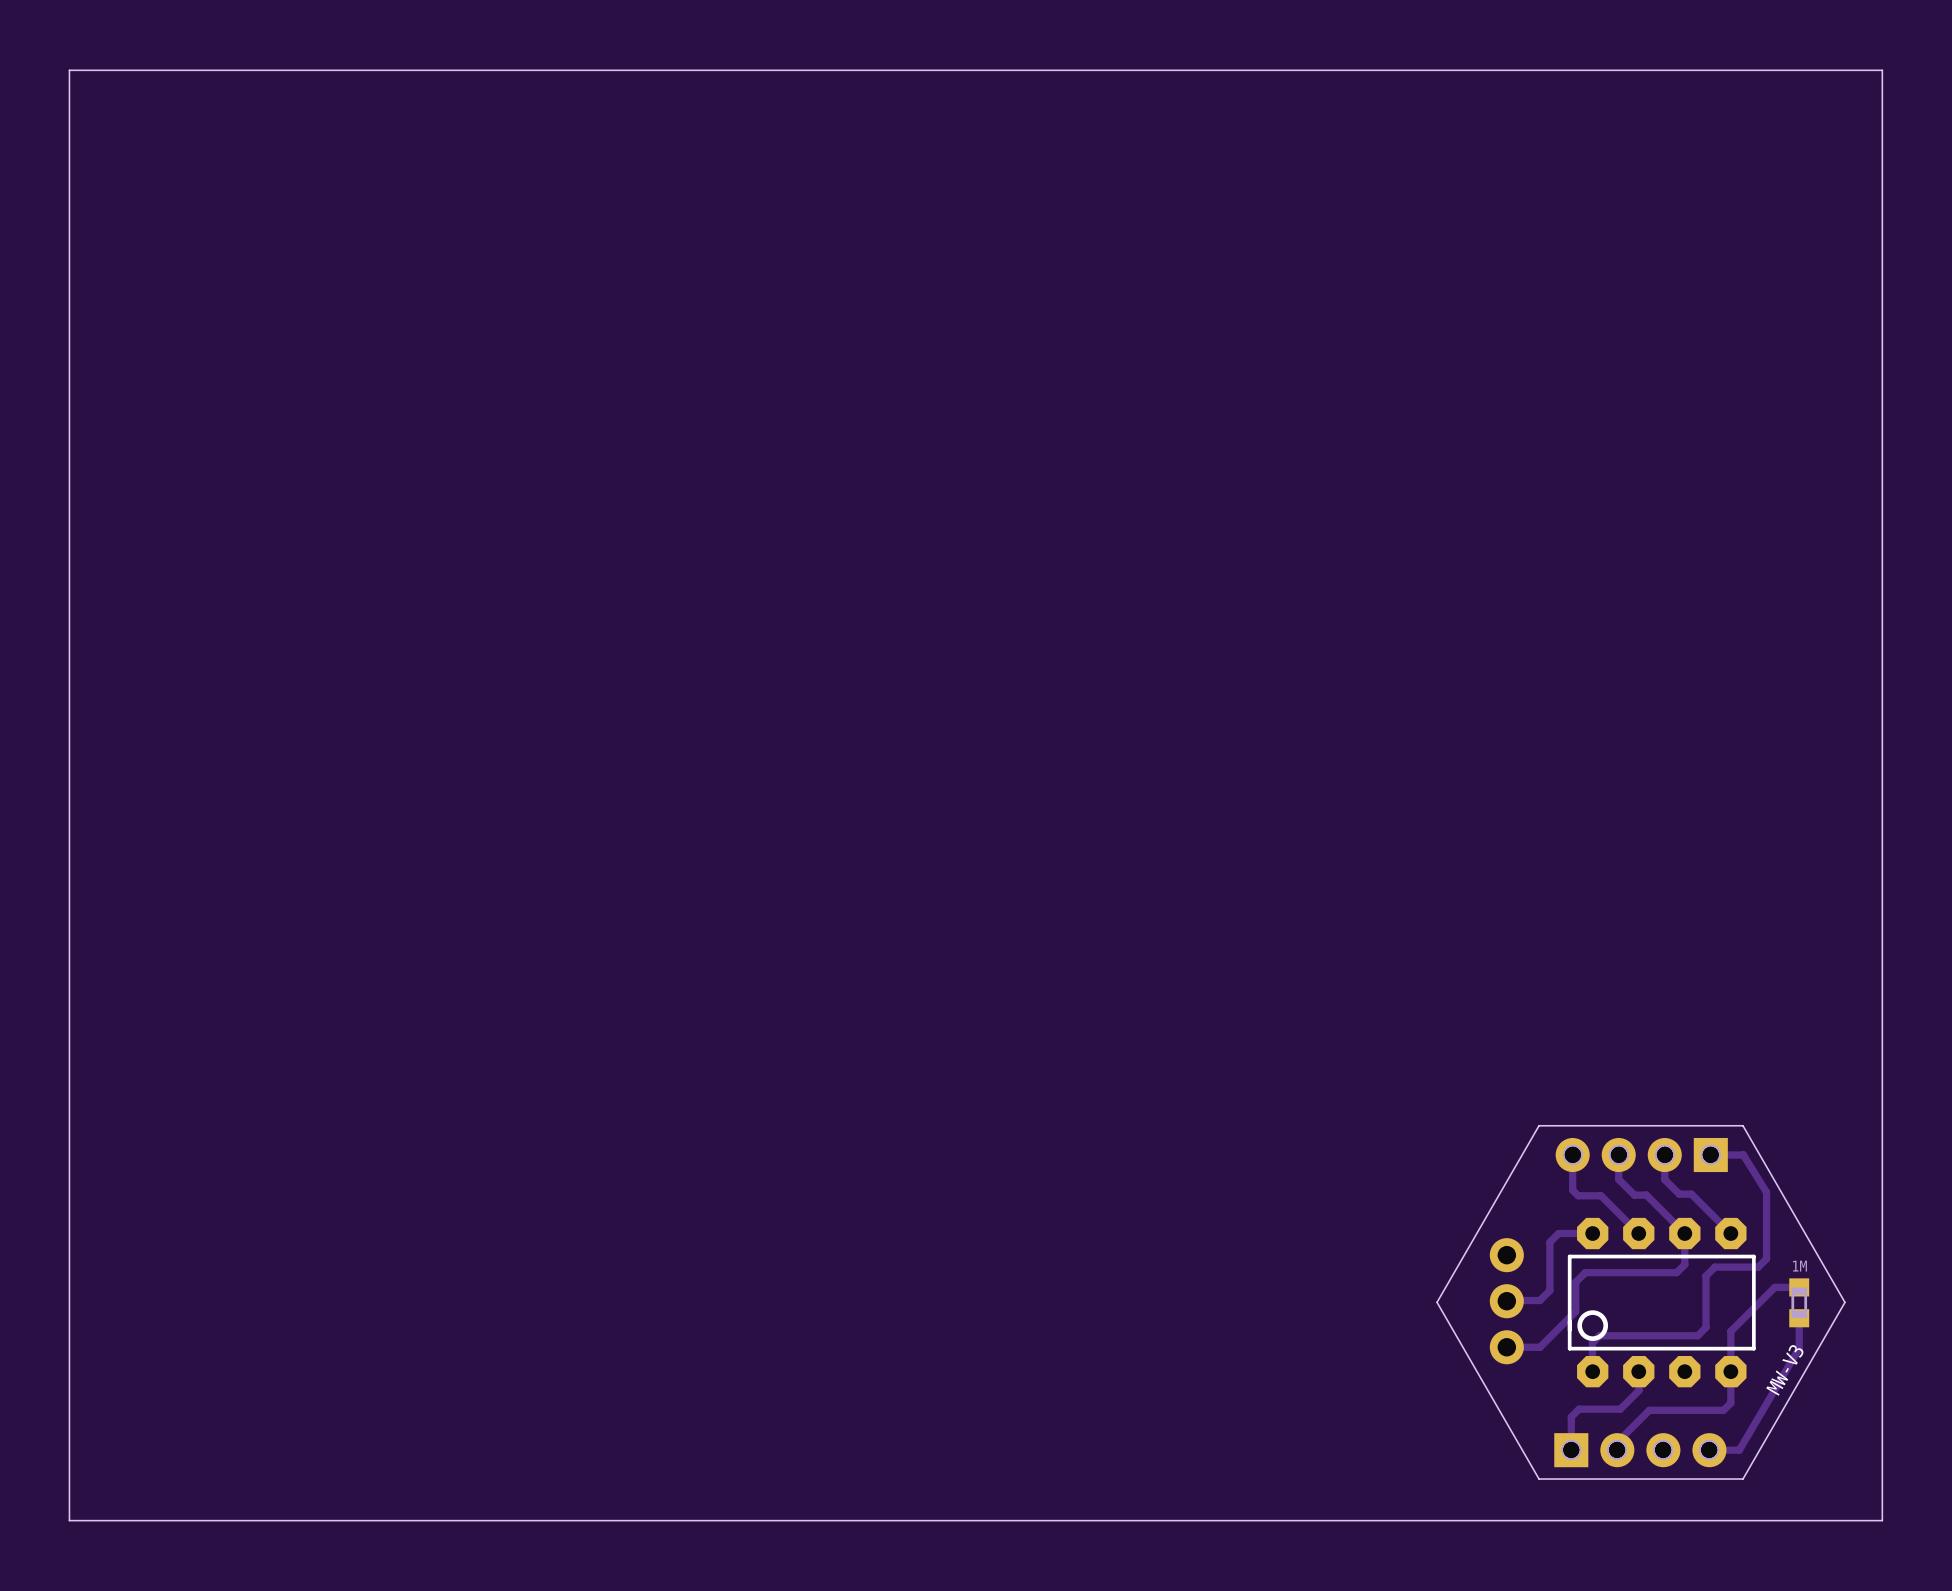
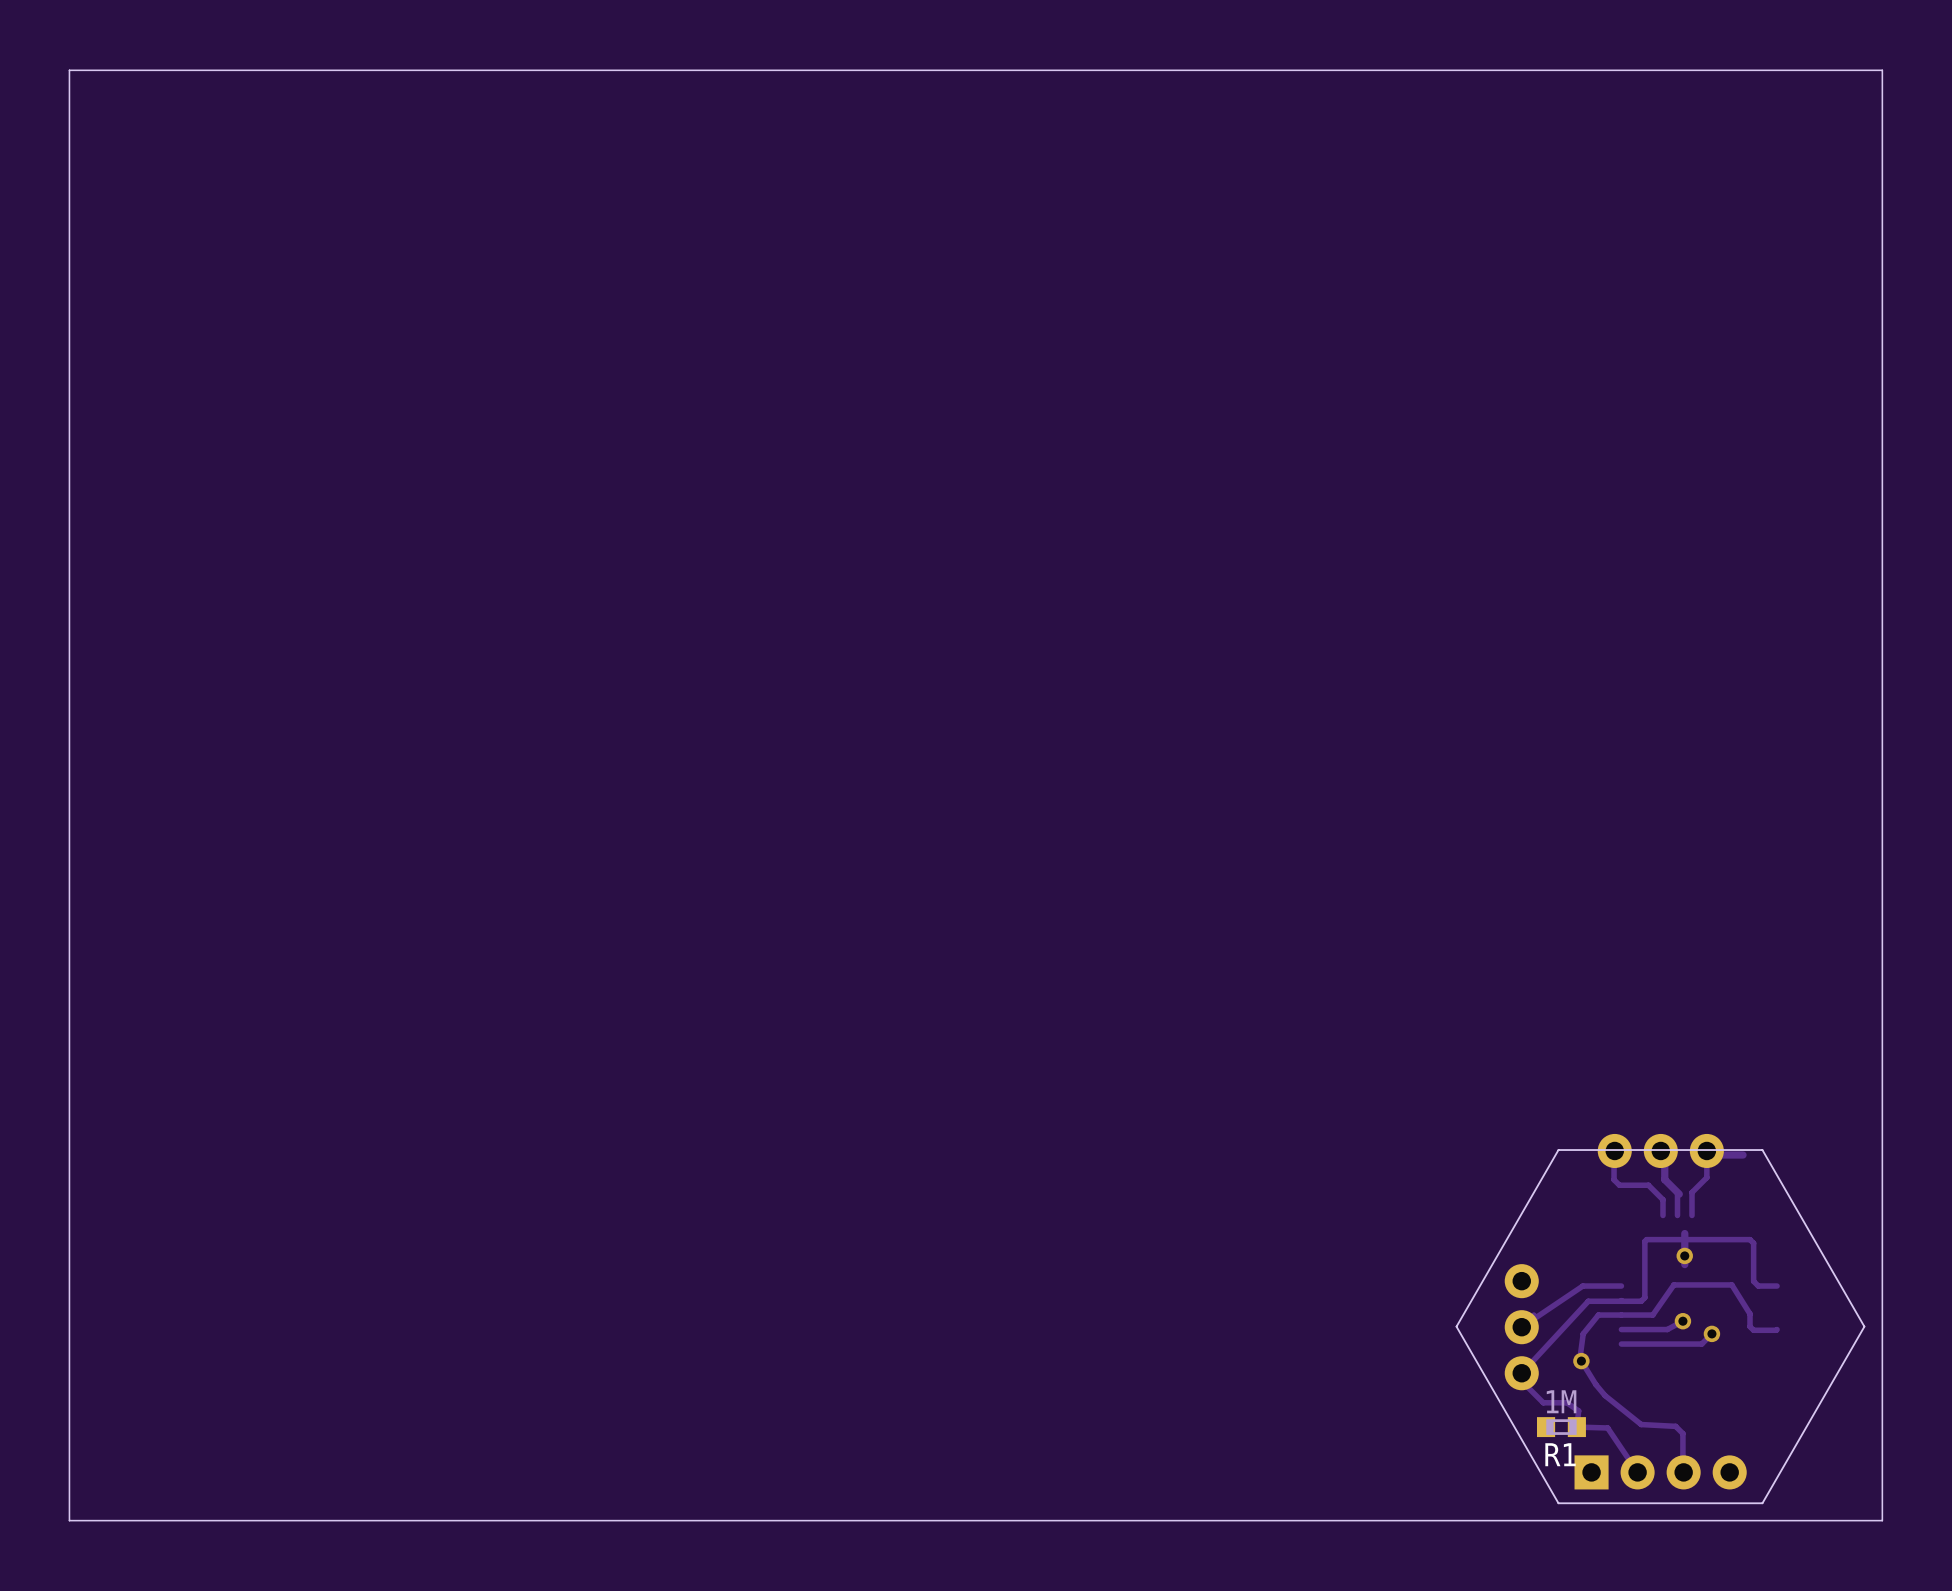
board edge: (1742, 1125) (1539, 1125) (1437, 1302) (1539, 1479) (1742, 1479) (1844, 1302) (1742, 1125) -> (1762, 1150) (1558, 1150) (1456, 1326) (1558, 1503) (1762, 1503) (1864, 1326) (1762, 1150)
line: (1574, 1145) (1567, 1147) (1563, 1153) (1565, 1160) (1571, 1163) (1578, 1162) (1581, 1156) (1580, 1149) (1574, 1145) -> none
line: (1620, 1145) (1613, 1147) (1609, 1153) (1611, 1160) (1617, 1163) (1624, 1162) (1627, 1156) (1626, 1149) (1620, 1145) -> none
line: (1666, 1145) (1659, 1147) (1655, 1153) (1657, 1160) (1663, 1163) (1670, 1162) (1673, 1156) (1672, 1149) (1666, 1145) -> none
line: (1711, 1145) (1717, 1149) (1719, 1156) (1716, 1162) (1709, 1163) (1703, 1160) (1701, 1153) (1705, 1147) (1711, 1145) -> none
track: none -> (1614, 1150) (1614, 1179) (1619, 1185) (1648, 1185) (1662, 1199) (1662, 1215)
part: none -> (1660, 1150)
track: none -> (1706, 1150) (1706, 1177) (1691, 1192) (1691, 1215)
track: (1743, 1154) (1766, 1192) (1766, 1258) (1758, 1267) (1714, 1267) (1705, 1276) (1705, 1327) (1697, 1335) (1599, 1335) (1592, 1342) (1592, 1371) -> none
track: (1572, 1155) (1572, 1190) (1578, 1195) (1600, 1195) (1638, 1233) -> none
track: (1618, 1155) (1618, 1179) (1634, 1195) (1646, 1195) (1684, 1233) -> none
part: (1641, 1155) -> none
track: none -> (1677, 1192) (1677, 1215)
track: (1679, 1194) (1691, 1194) (1730, 1233) -> none
track: (1592, 1233) (1558, 1233) (1549, 1242) (1549, 1290) (1539, 1300) (1506, 1301) -> none
via: none -> (1684, 1255)
track: (1684, 1264) (1676, 1272) (1585, 1272) (1575, 1282) (1575, 1311) (1539, 1347) (1506, 1347) -> none
track: none -> (1621, 1286) (1582, 1286) (1521, 1327) (1533, 1315)
track: none -> (1777, 1286) (1758, 1286) (1753, 1281) (1753, 1243) (1750, 1239) (1646, 1239) (1644, 1241) (1644, 1297) (1641, 1301) (1588, 1301) (1521, 1373) (1521, 1381) (1543, 1402) (1566, 1402) (1578, 1410) (1576, 1427) (1607, 1427) (1637, 1472)
track: (1799, 1287) (1774, 1287) (1730, 1331) (1730, 1402) (1723, 1410) (1649, 1410) (1621, 1437) (1621, 1445) (1617, 1450) -> none
part position: (1506, 1301) -> (1521, 1327)
part: (1661, 1302) -> none
part: 1M (1799, 1302) -> none
track: (1799, 1318) (1799, 1348) (1739, 1450) (1709, 1450) -> none
track: none -> (1682, 1321) (1667, 1329) (1621, 1329)
via: none -> (1682, 1321)
track: none -> (1777, 1329) (1753, 1330) (1750, 1326) (1750, 1313) (1731, 1284) (1673, 1284) (1652, 1315) (1598, 1315) (1583, 1333) (1579, 1361) (1604, 1395) (1641, 1424) (1675, 1426) (1682, 1433) (1683, 1472)
track: none -> (1711, 1333) (1701, 1344) (1621, 1344)
via: none -> (1711, 1333)
via: none -> (1581, 1361)
text: MW-V3 (1784, 1370) -> none
track: (1638, 1371) (1638, 1390) (1620, 1409) (1579, 1409) (1571, 1417) (1571, 1450) -> none
R1: none -> 1M (1561, 1427)
line: (1572, 1440) (1578, 1444) (1580, 1451) (1576, 1457) (1570, 1459) (1564, 1455) (1562, 1448) (1565, 1442) (1572, 1440) -> none
line: (1618, 1440) (1611, 1442) (1608, 1448) (1609, 1455) (1615, 1459) (1622, 1457) (1626, 1451) (1624, 1444) (1618, 1440) -> none
line: (1664, 1440) (1657, 1442) (1654, 1448) (1655, 1455) (1661, 1459) (1668, 1457) (1672, 1451) (1670, 1444) (1664, 1440) -> none
line: (1710, 1440) (1703, 1442) (1700, 1448) (1701, 1455) (1707, 1459) (1714, 1457) (1718, 1451) (1716, 1444) (1710, 1440) -> none
part position: (1640, 1450) -> (1660, 1472)

